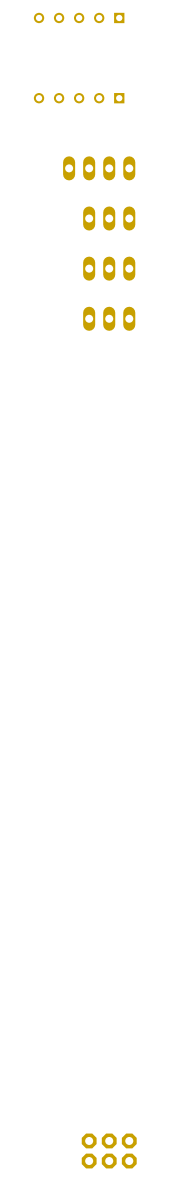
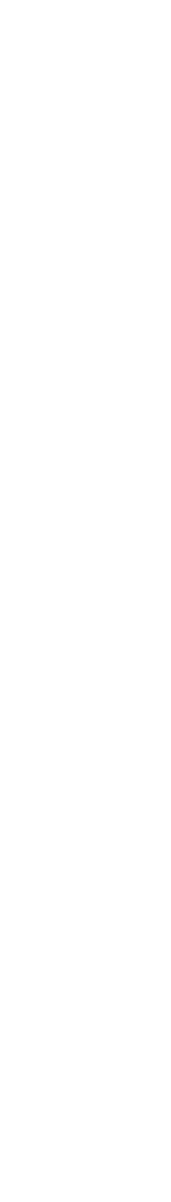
part: (79, 17) -> none
part: (79, 98) -> none
part: (99, 168) -> none
part: (109, 218) -> none
part: (109, 268) -> none
part: (109, 318) -> none
part: (109, 1150) -> none

